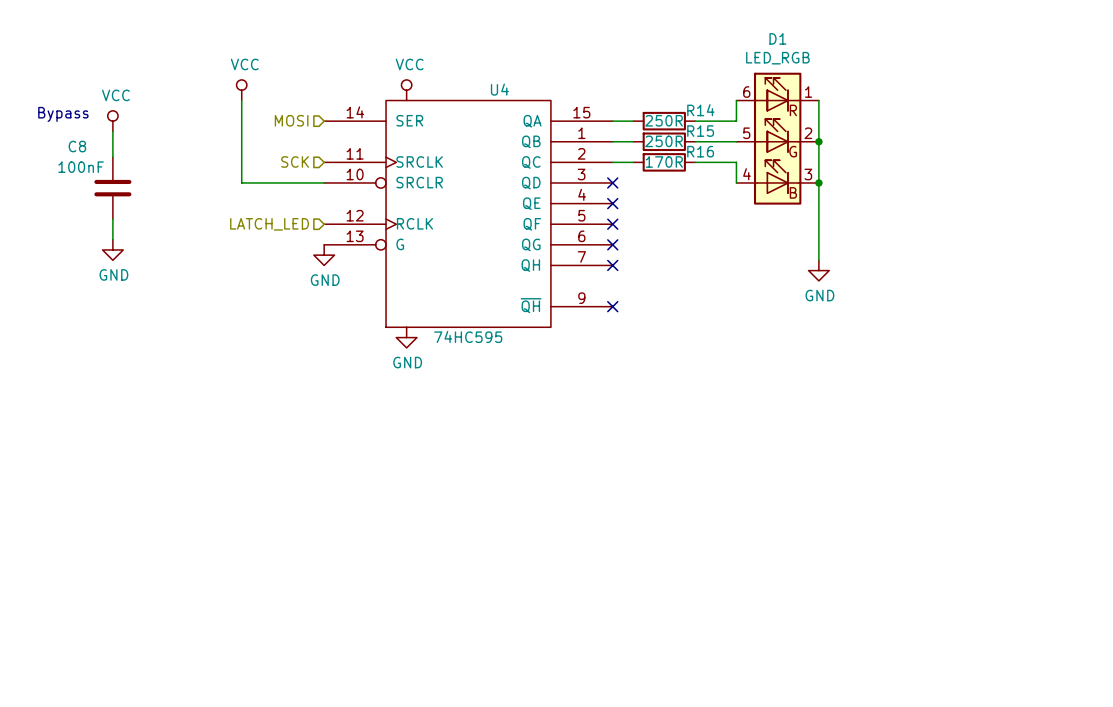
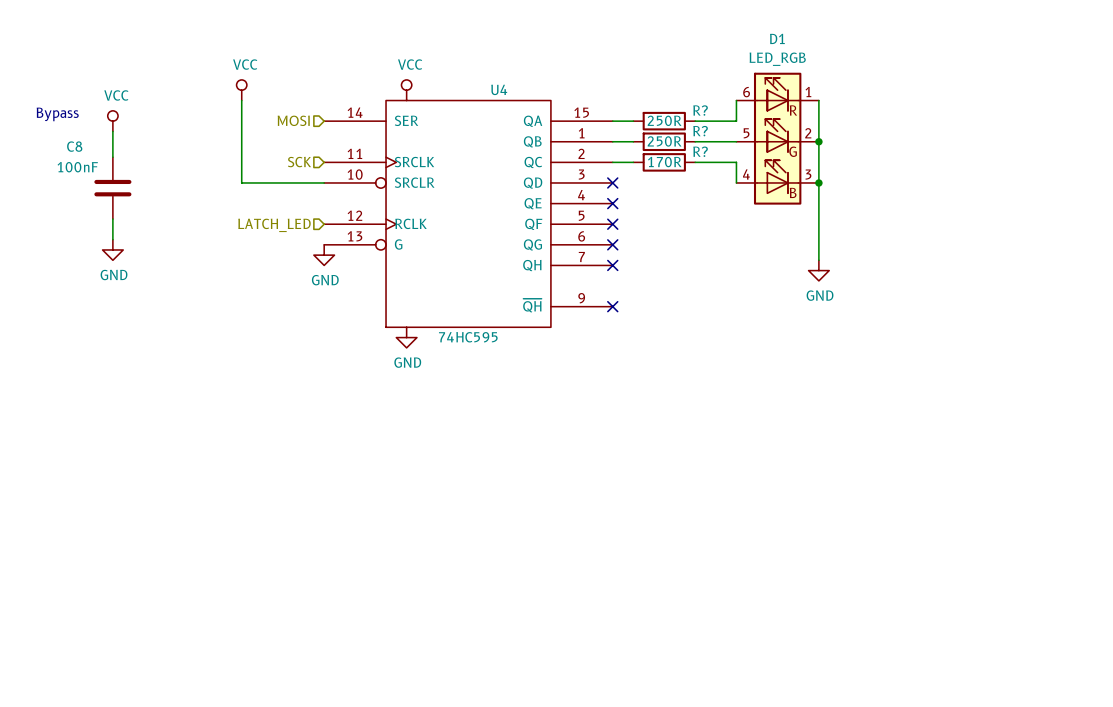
R14 name: R14 (700, 110) -> R? (700, 110)
R15 name: R15 (700, 131) -> R? (700, 131)
R16 name: R16 (700, 151) -> R? (700, 151)

